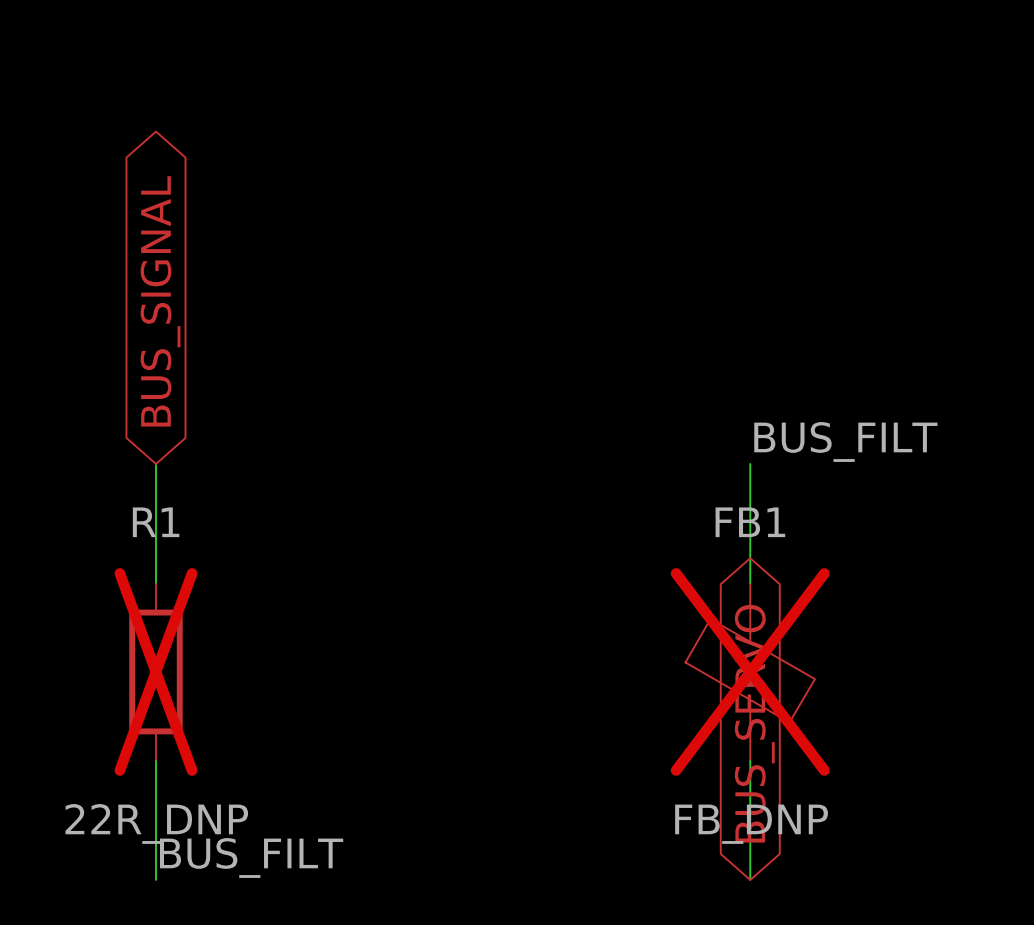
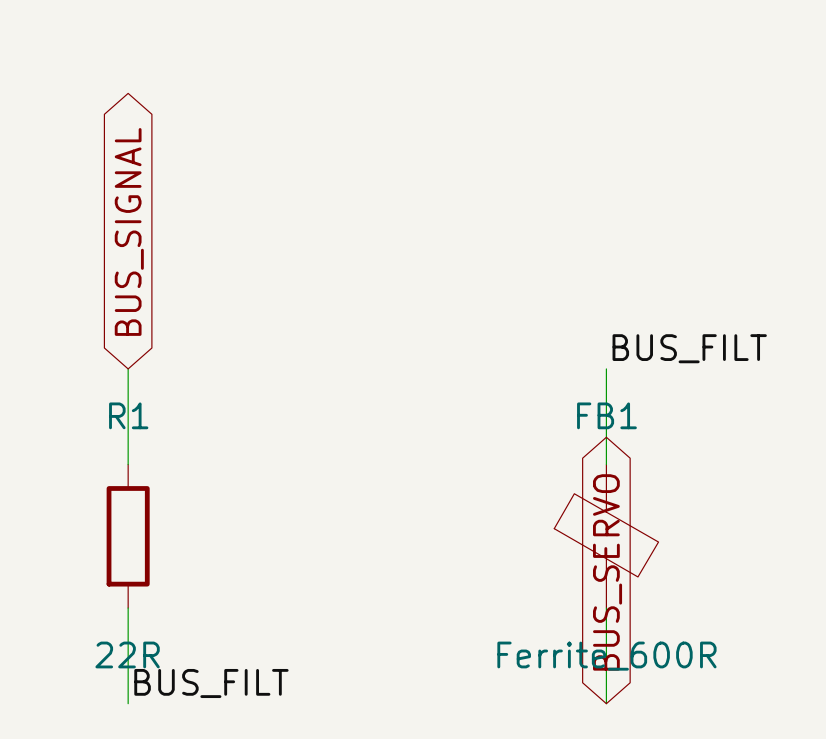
R1 do-not-place cross: (155, 671) -> none
FB1 do-not-place cross: (750, 671) -> none
R1 value: 22R_DNP (156, 823) -> 22R (127, 654)
FB1 value: FB_DNP (751, 824) -> Ferrite_600R (606, 656)

